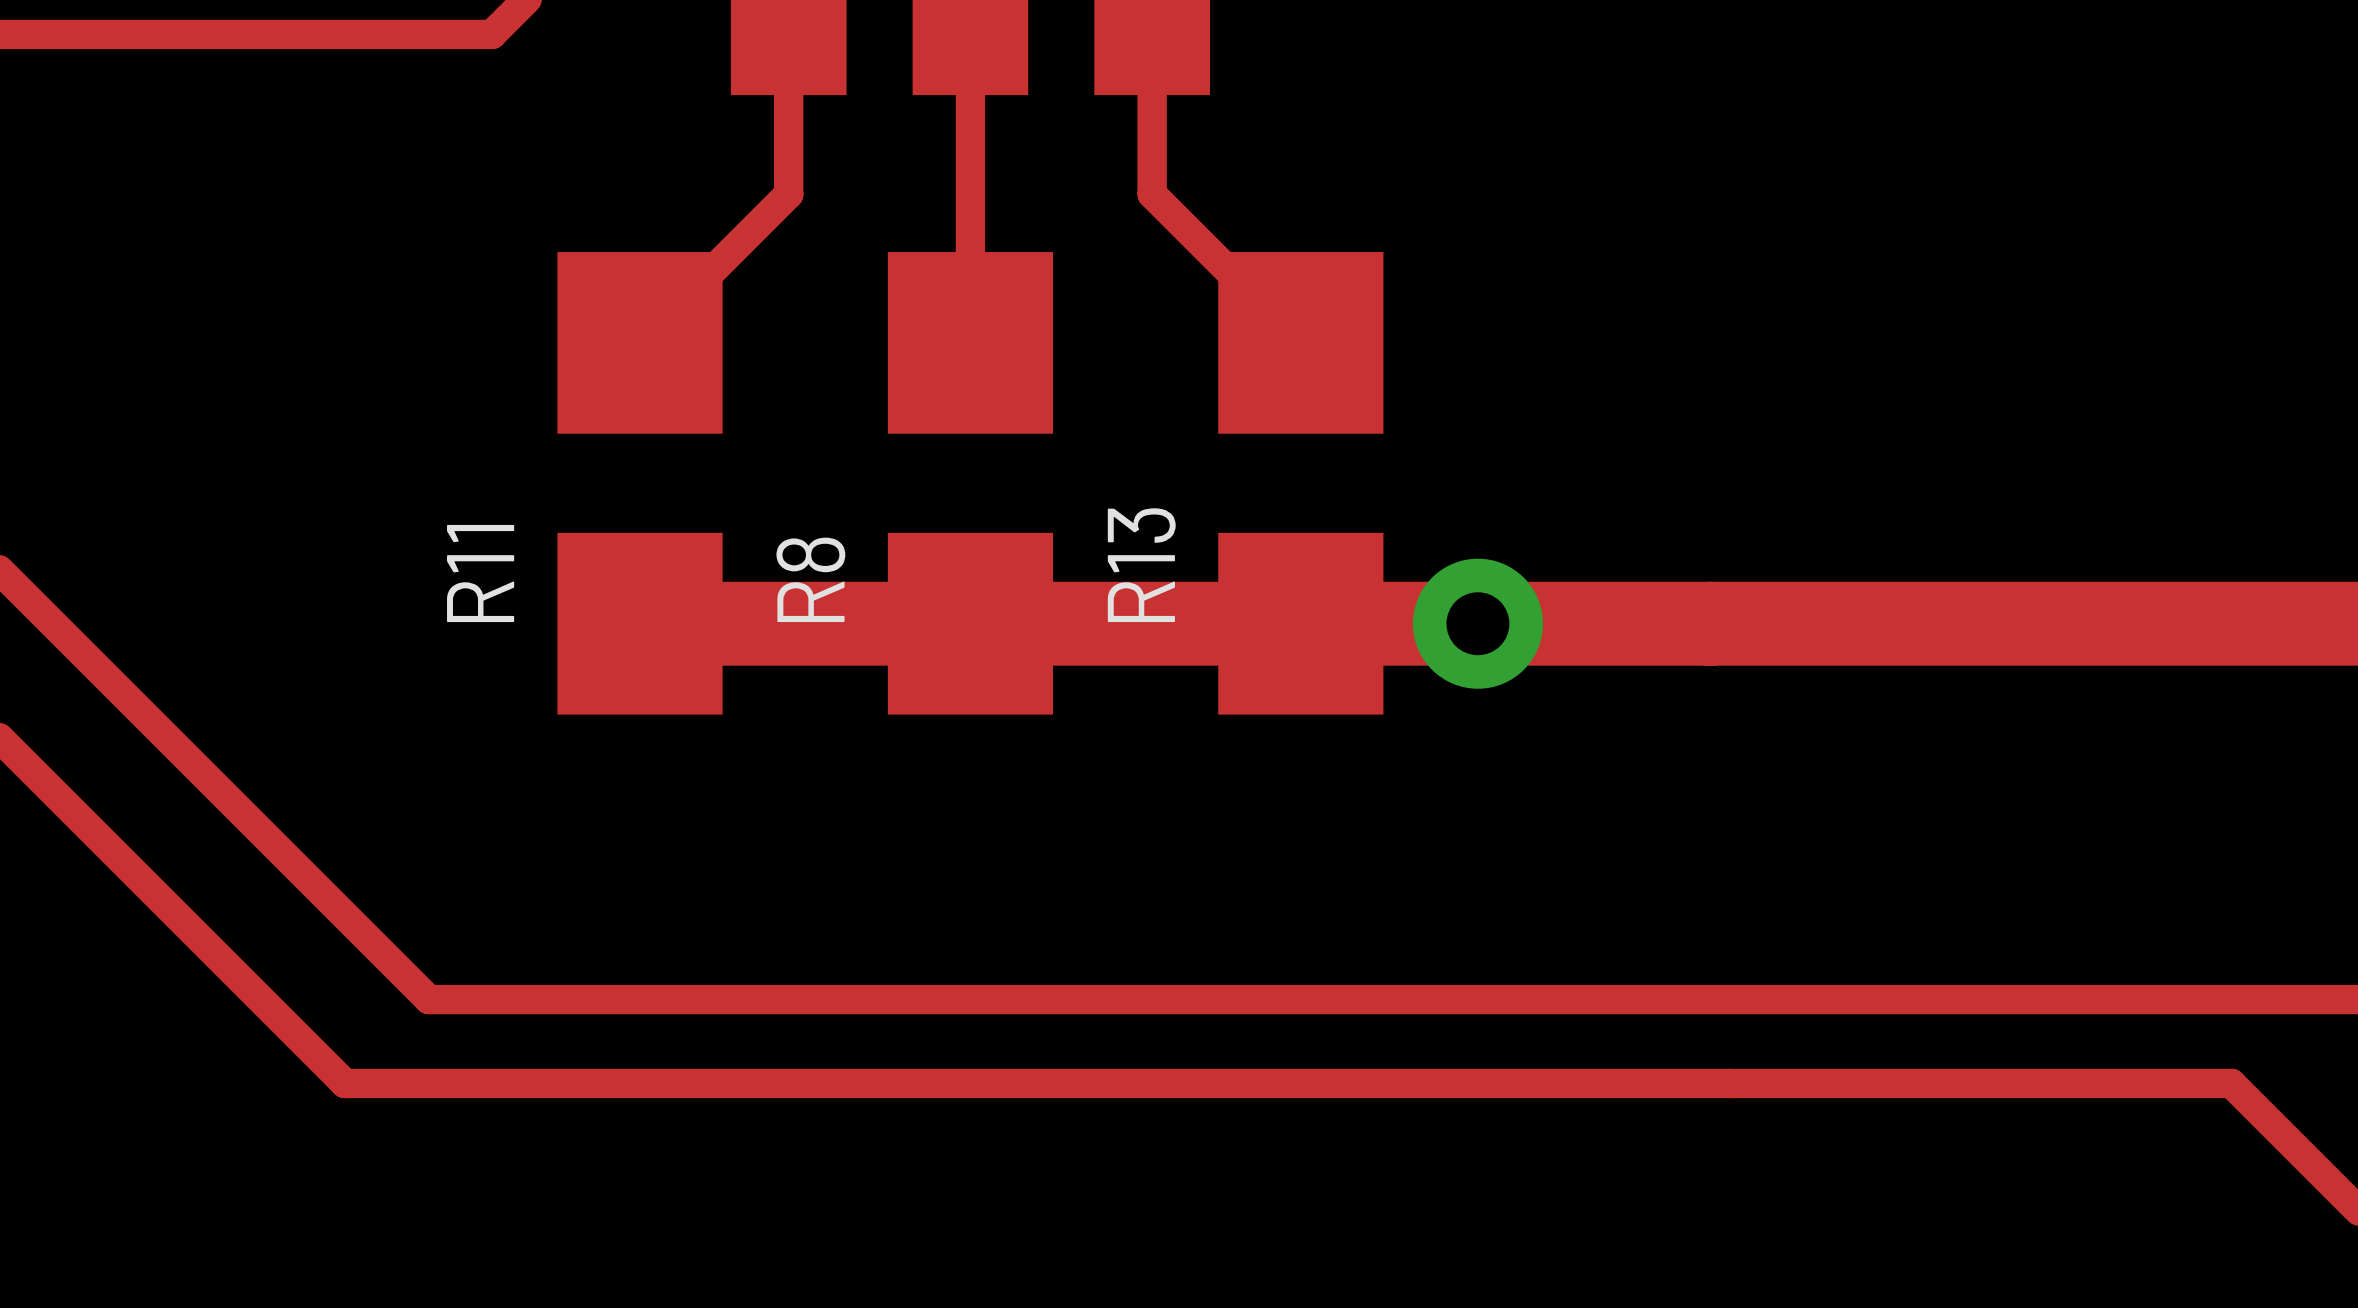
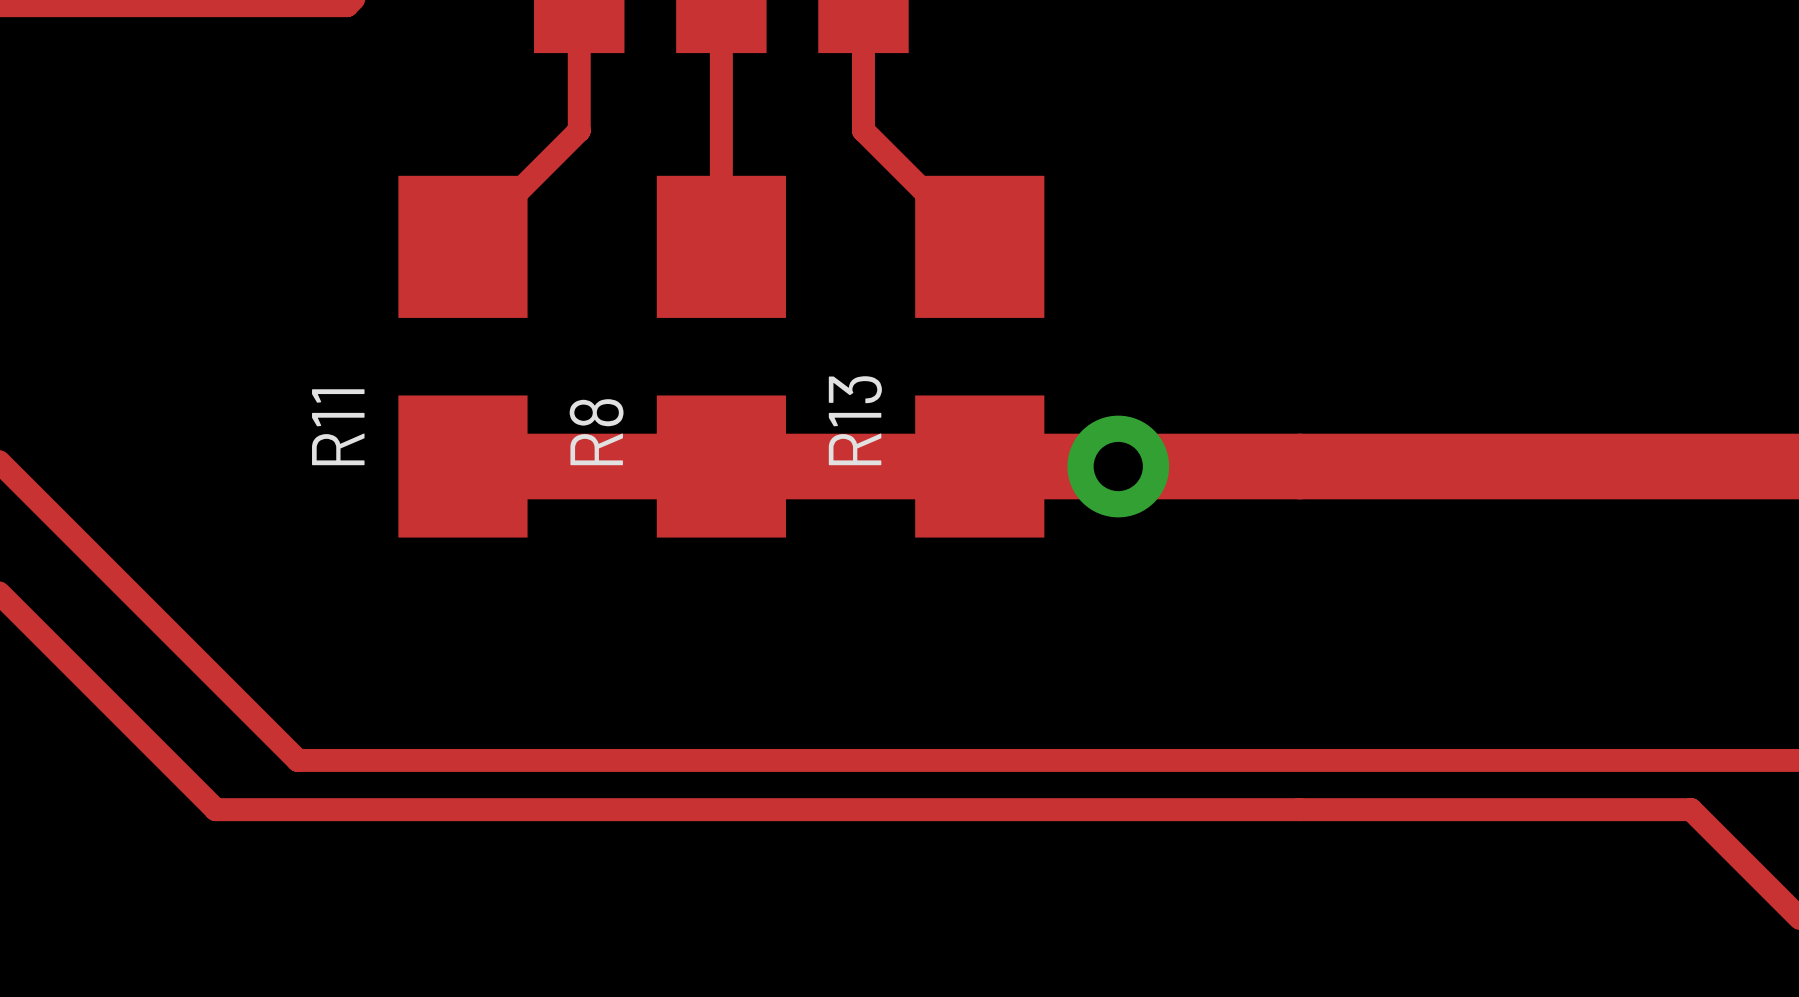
track: (324, 1062) (344, 1083) (2231, 1083) -> (215, 809) (1691, 809) (1707, 826)

